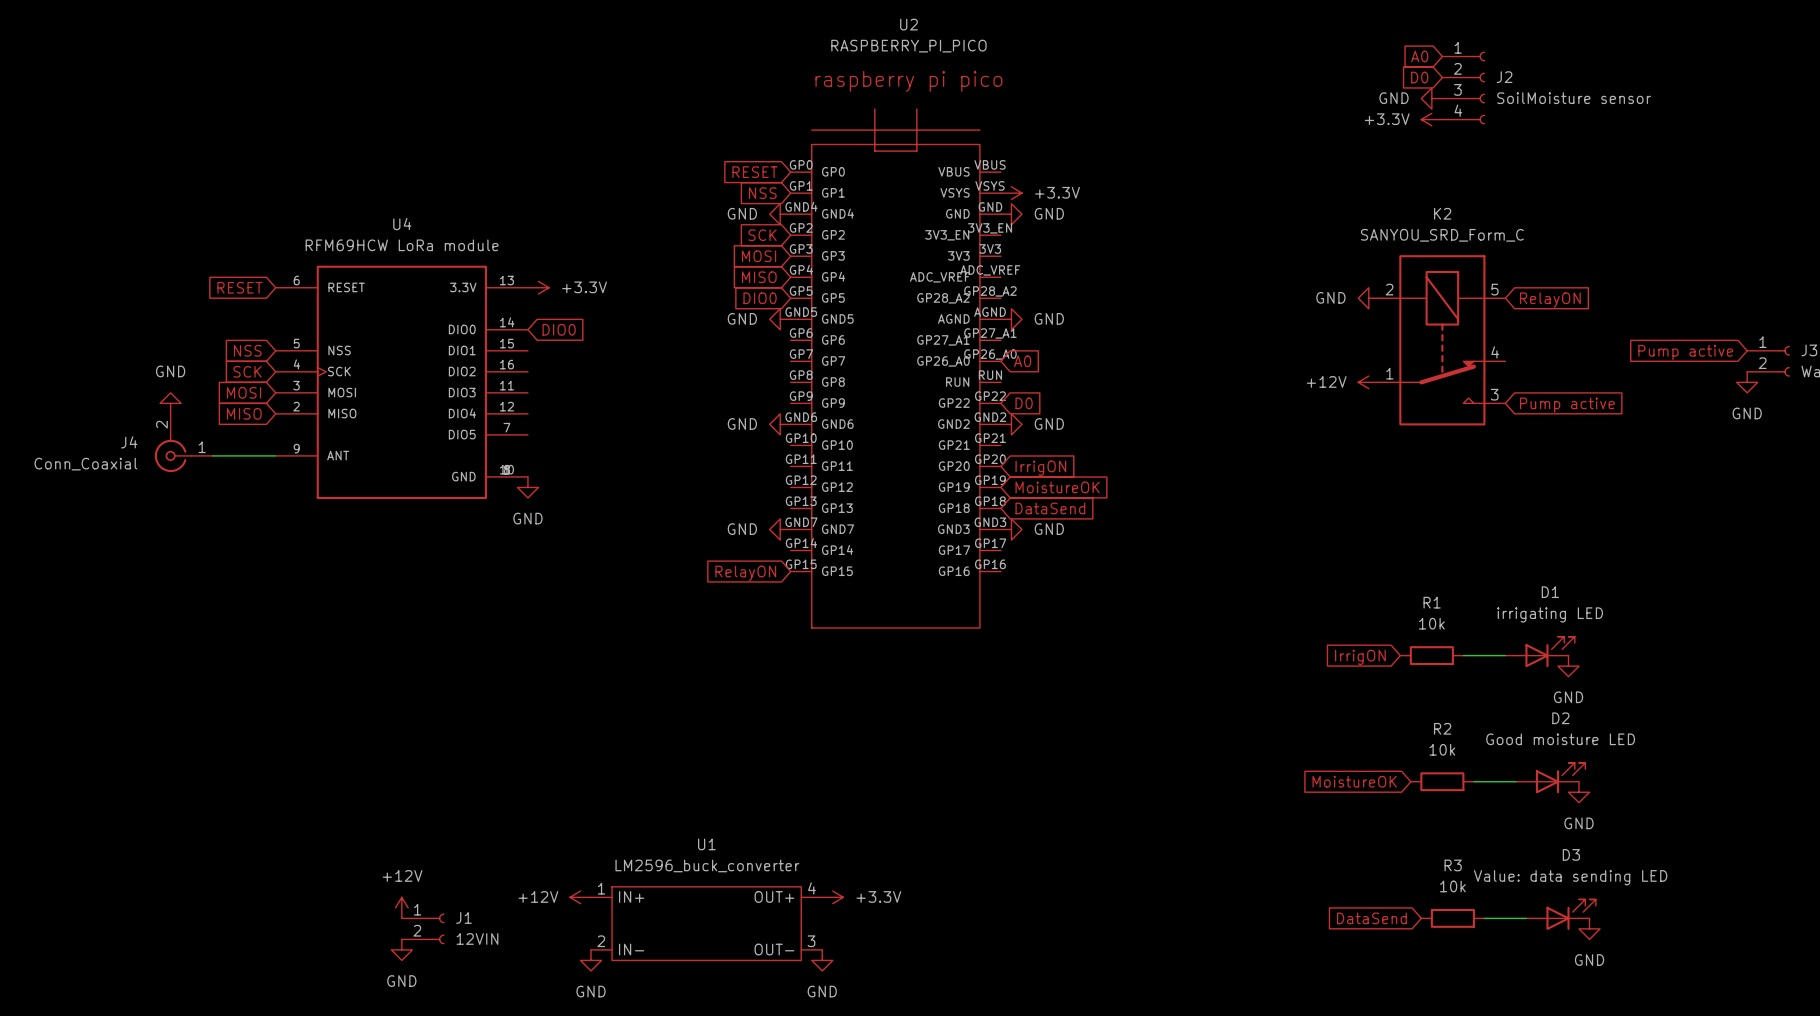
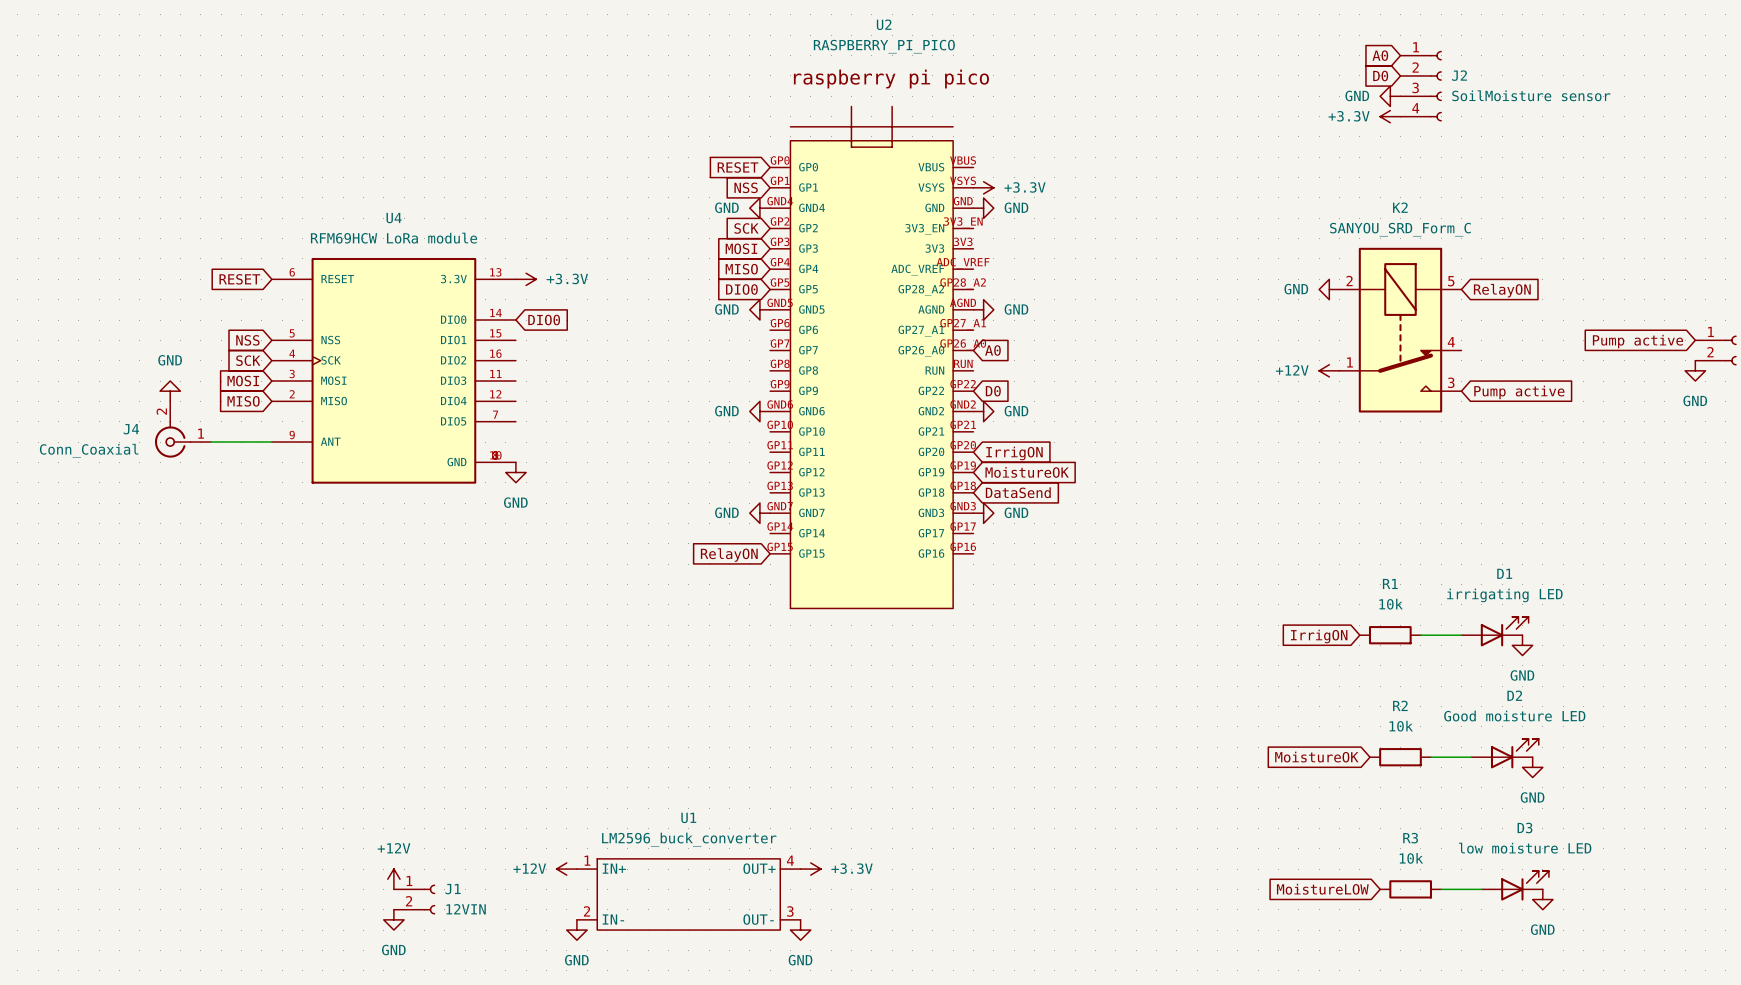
D3 value: Value: data sending LED (1570, 877) -> low moisture LED (1525, 848)
global label: DataSend (1371, 918) -> MoistureLOW (1322, 889)

